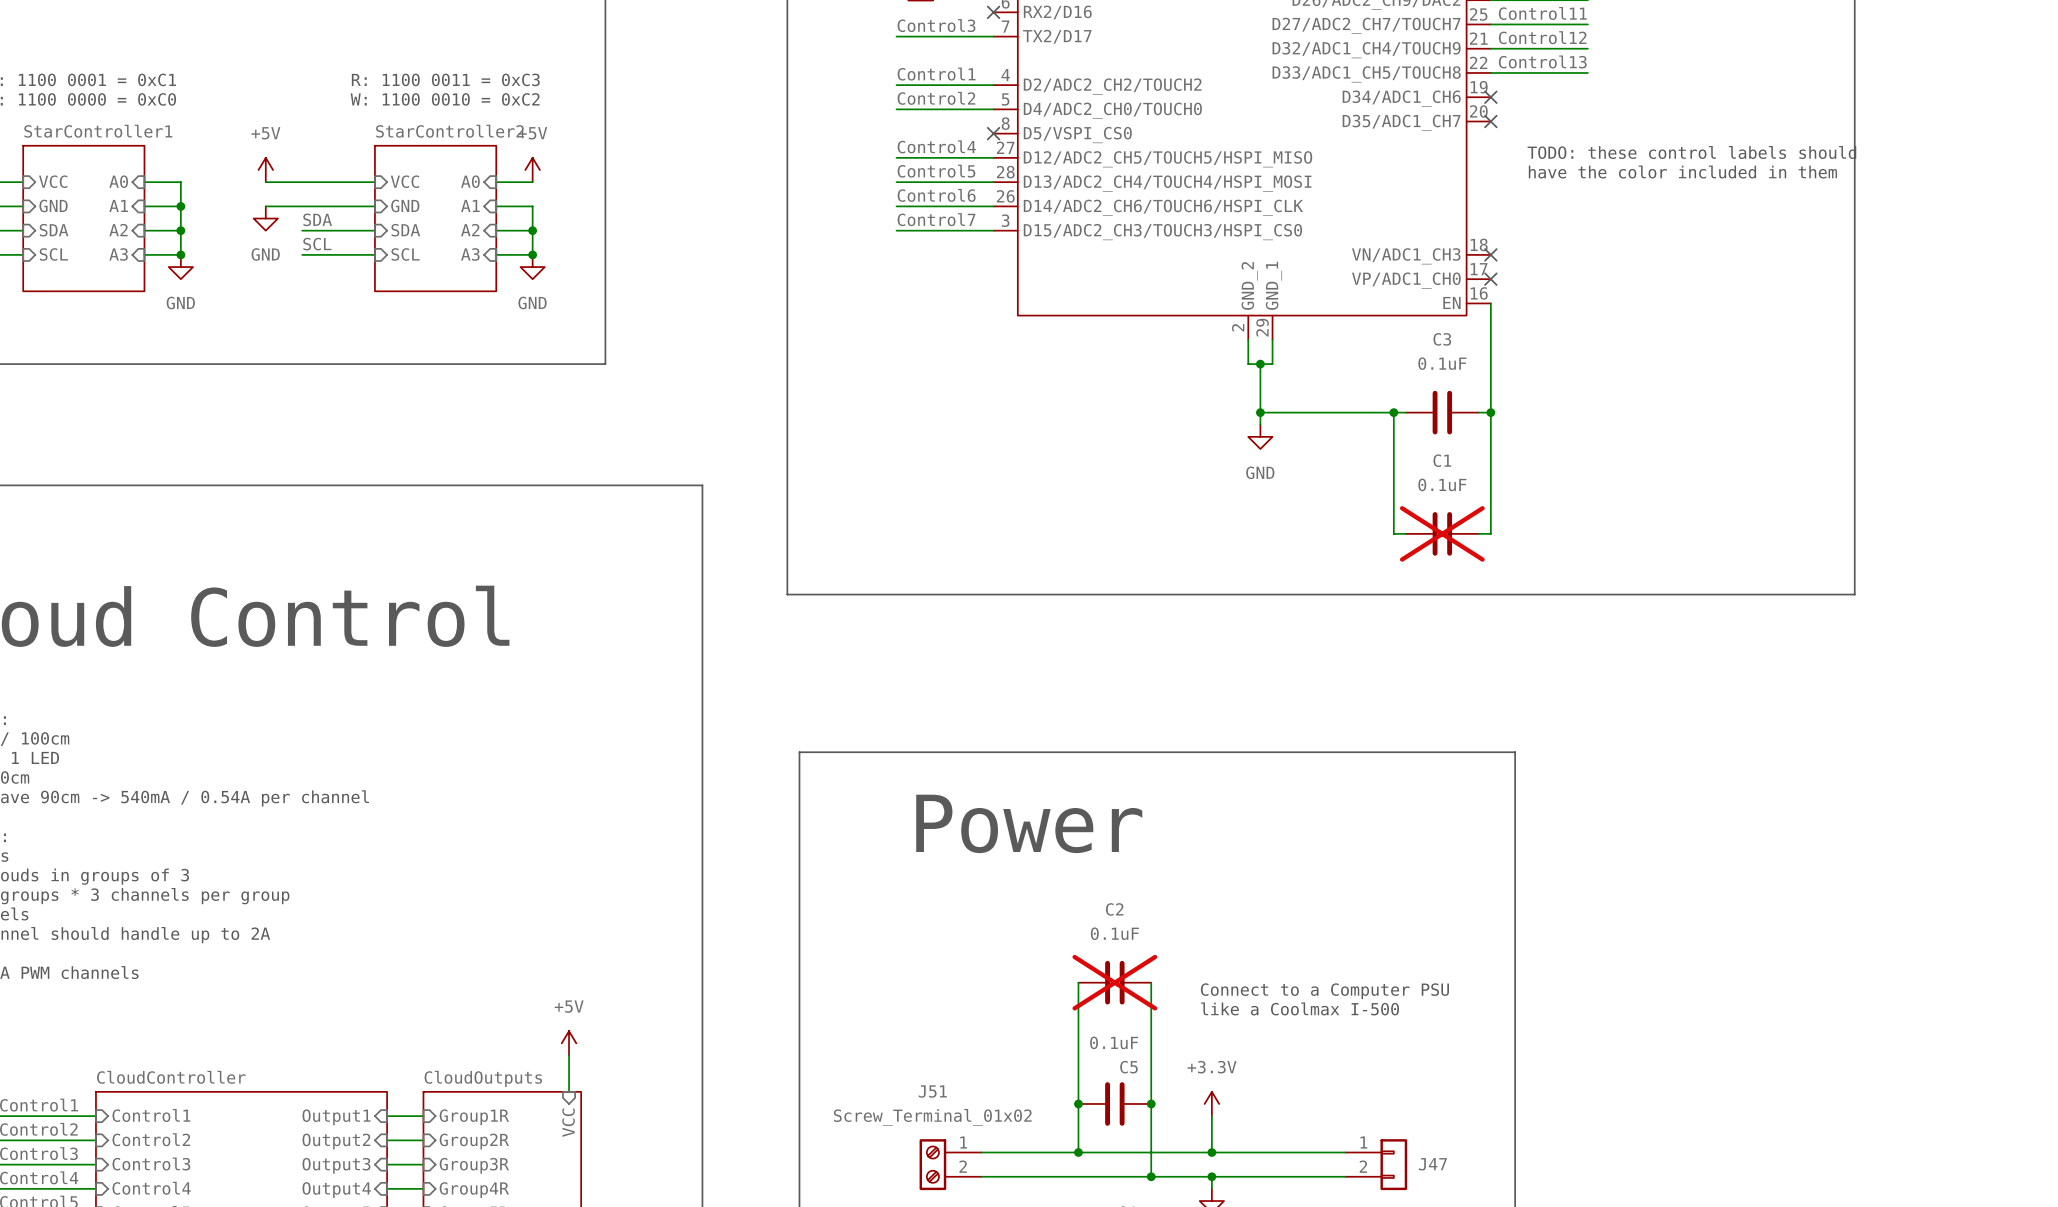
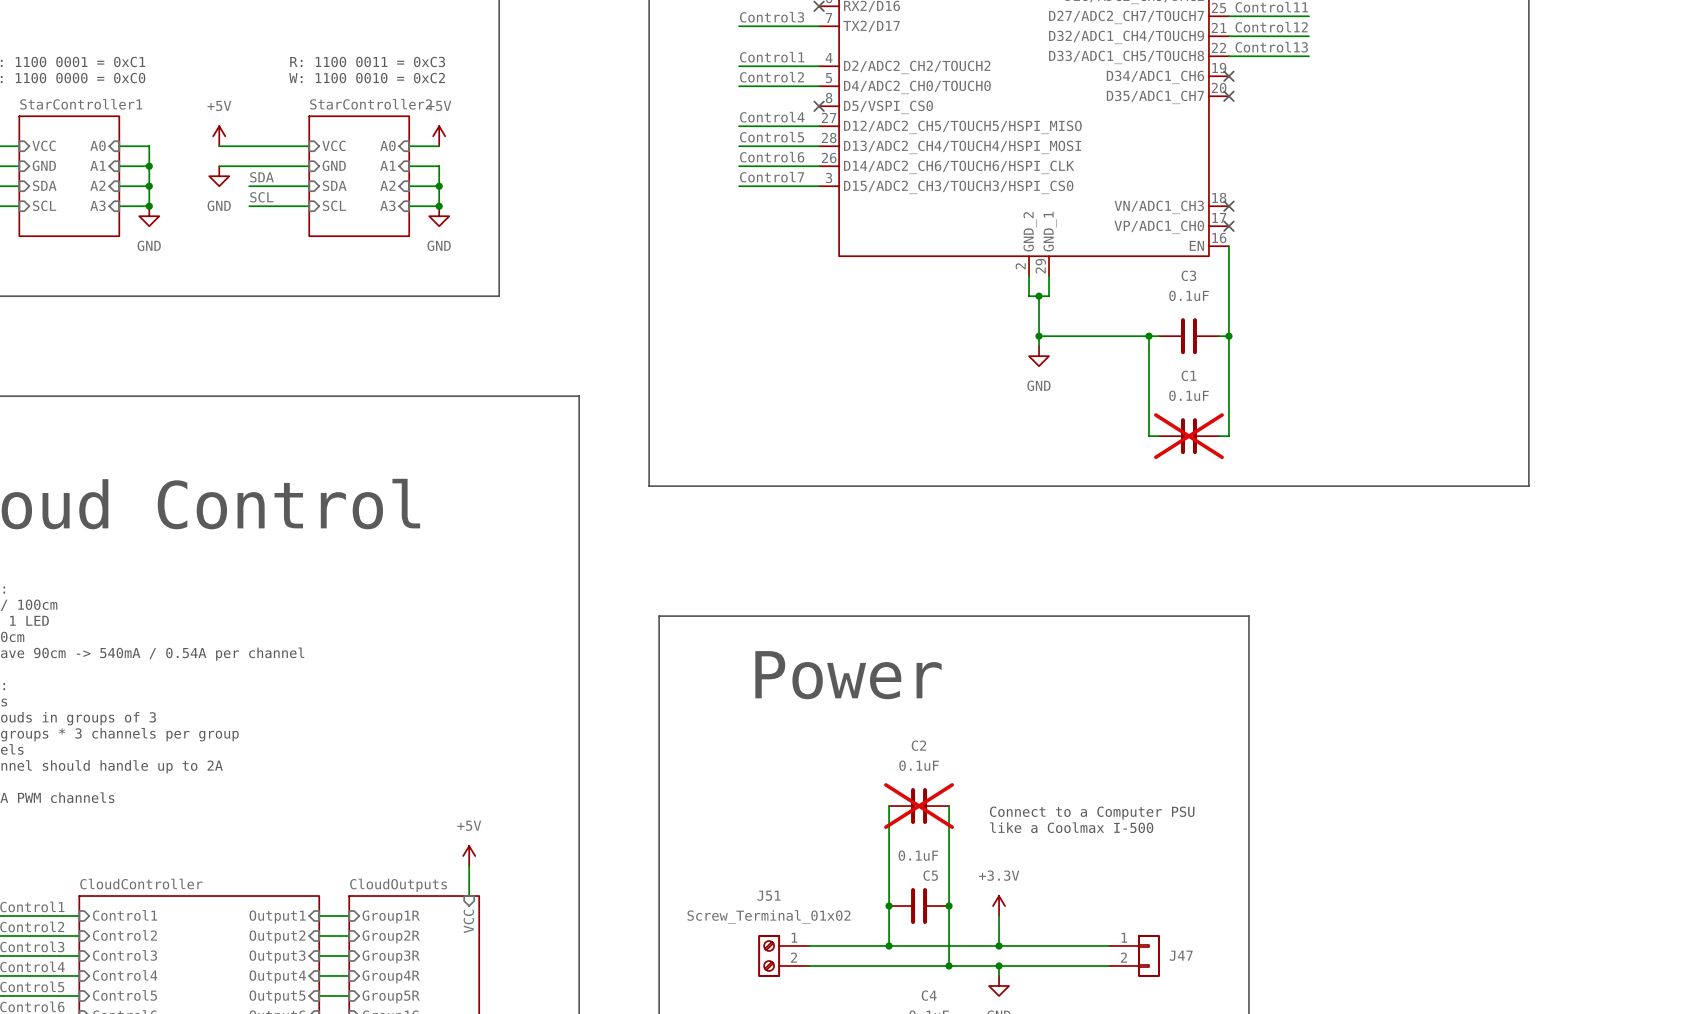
text: TODO: these control labels should (1691, 152) -> none
text: have the color included in them (1682, 172) -> none

